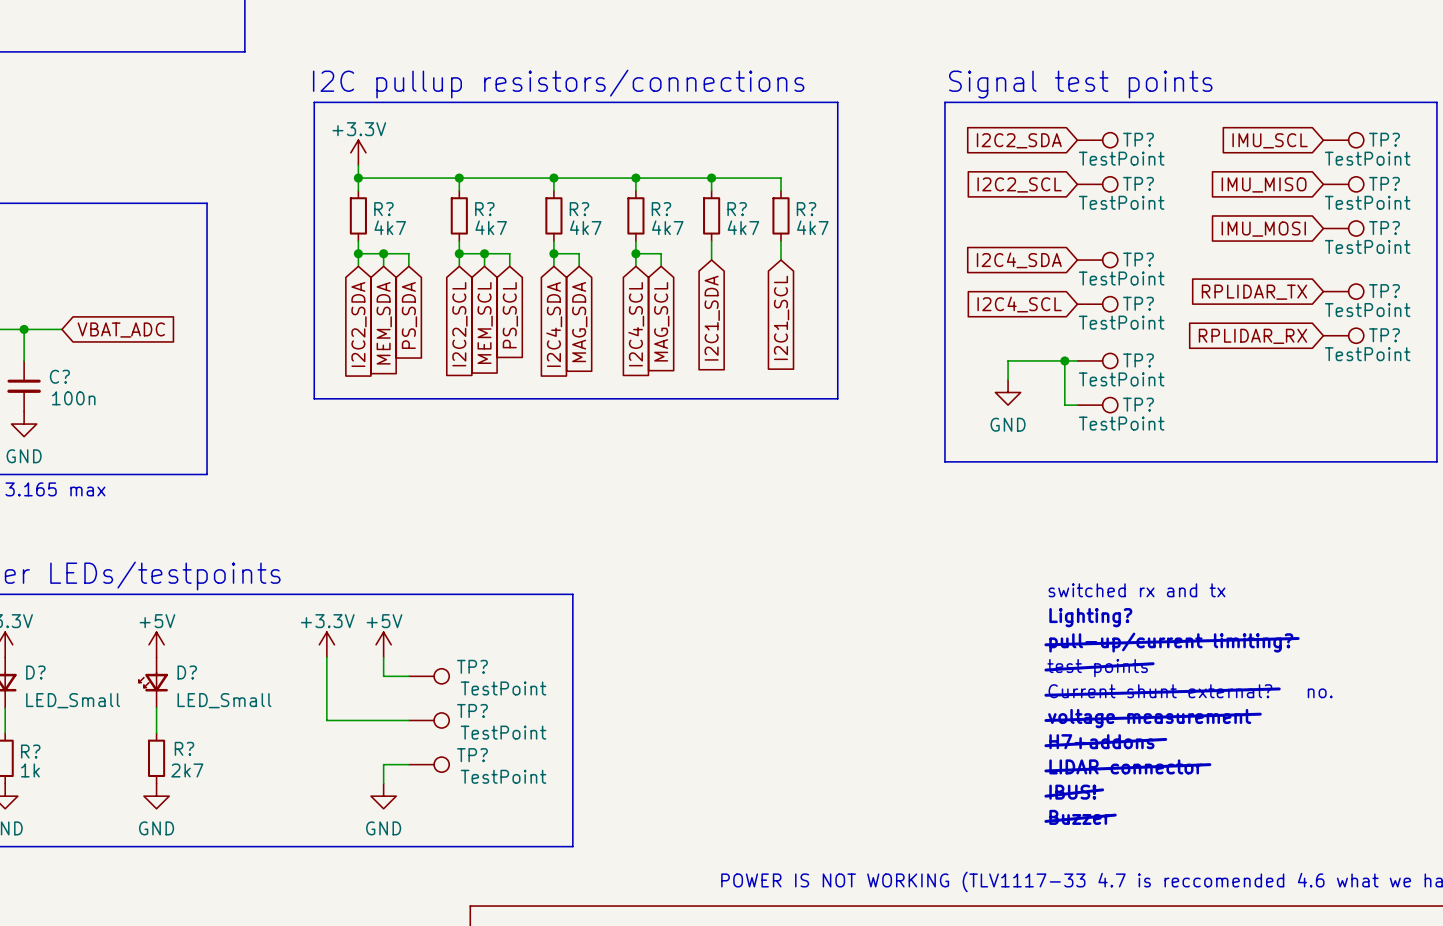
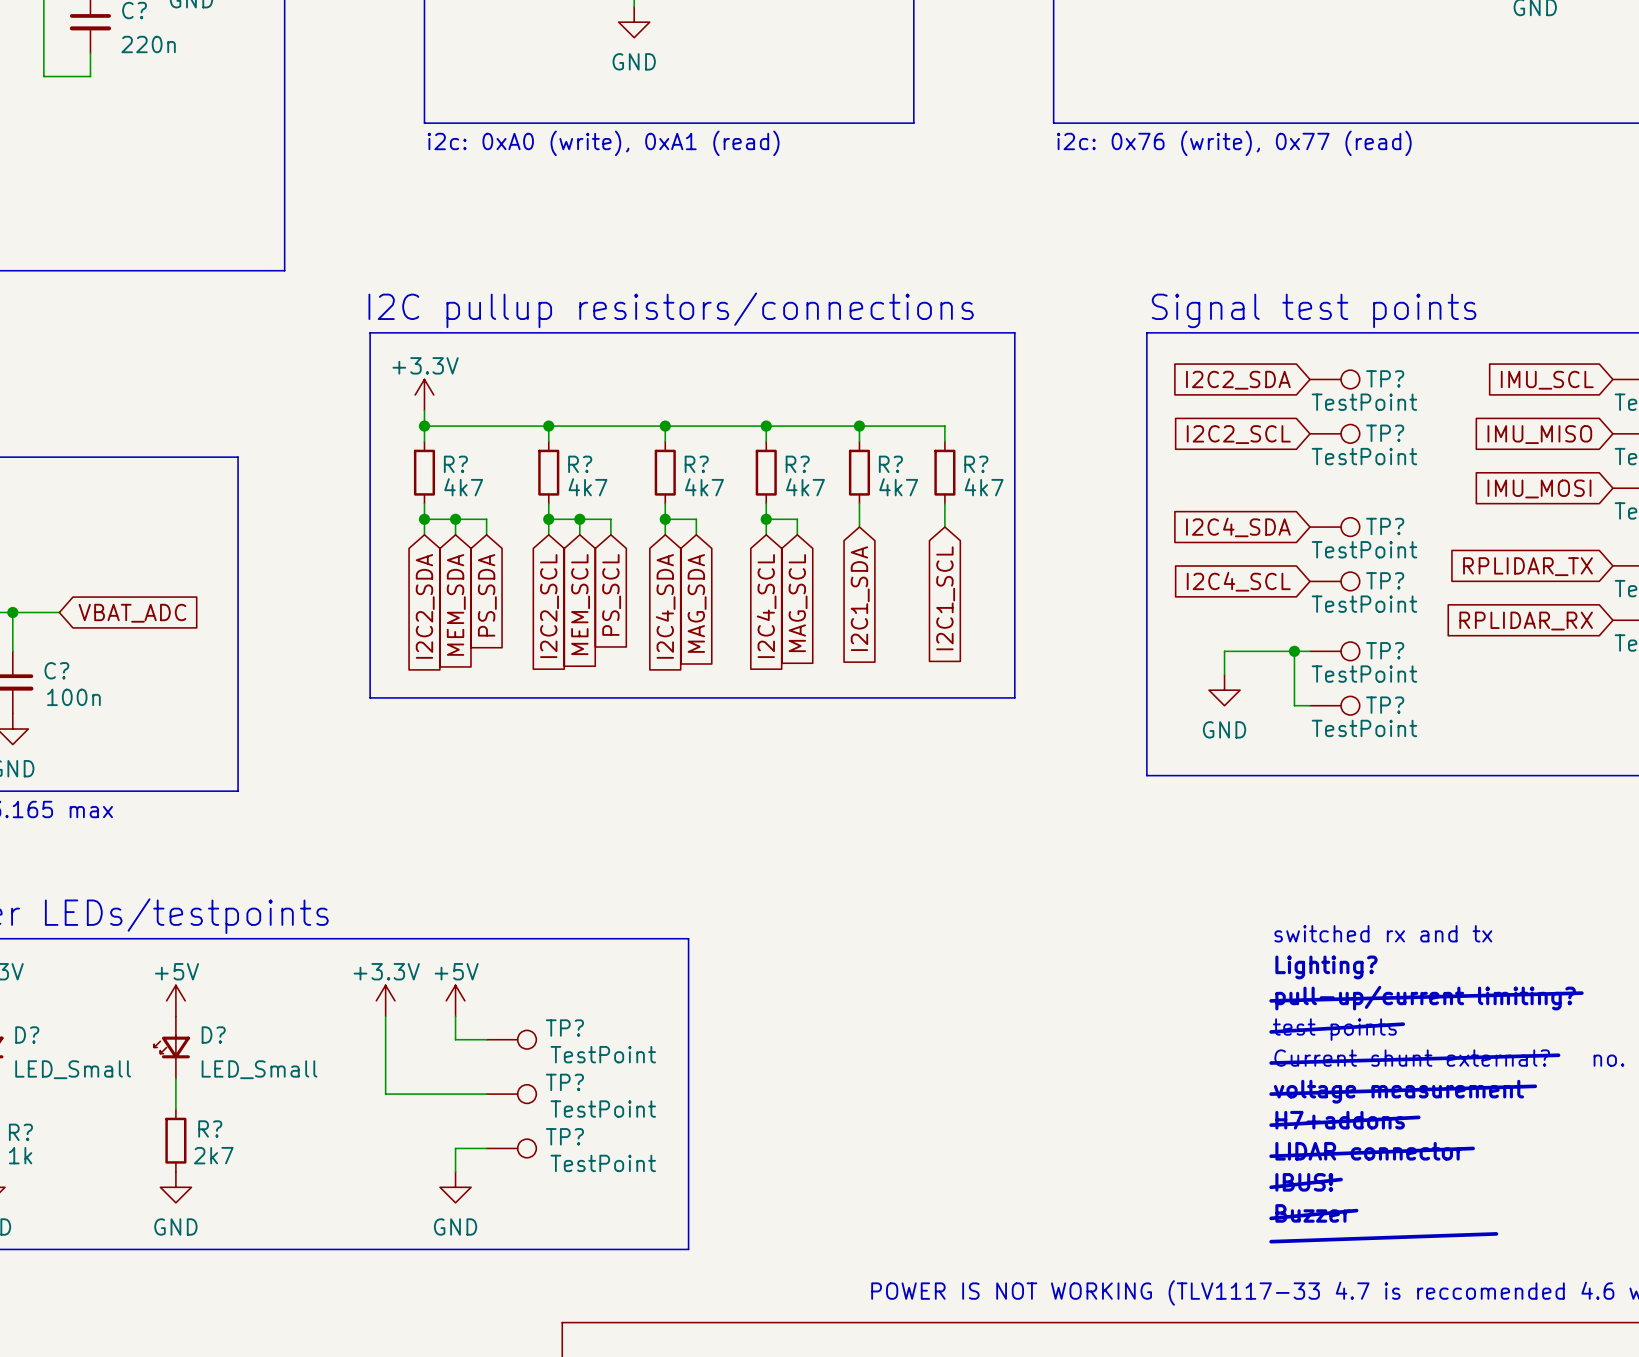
line: none -> (1496, 1233) (1271, 1241)

